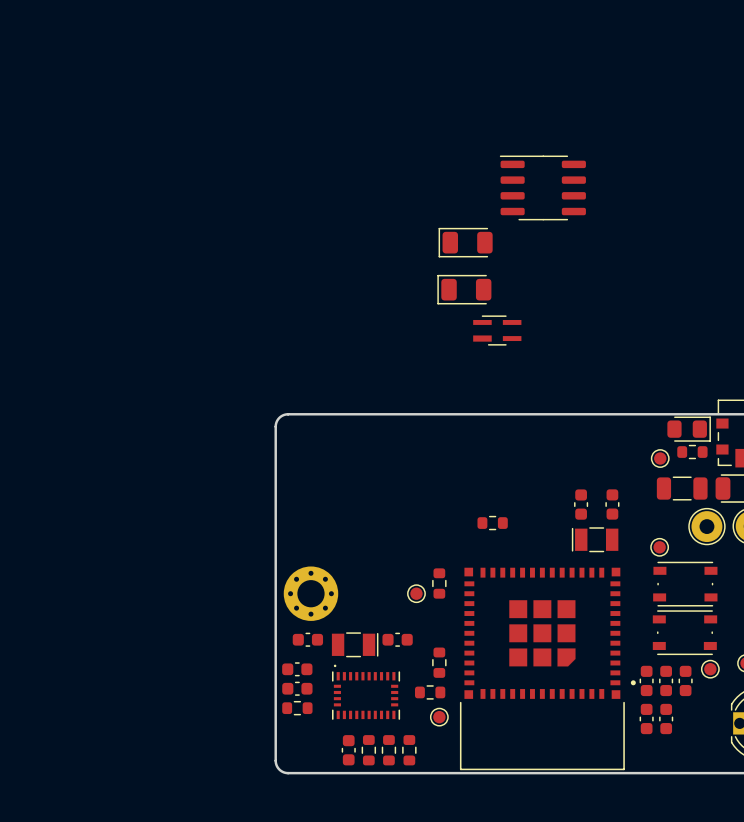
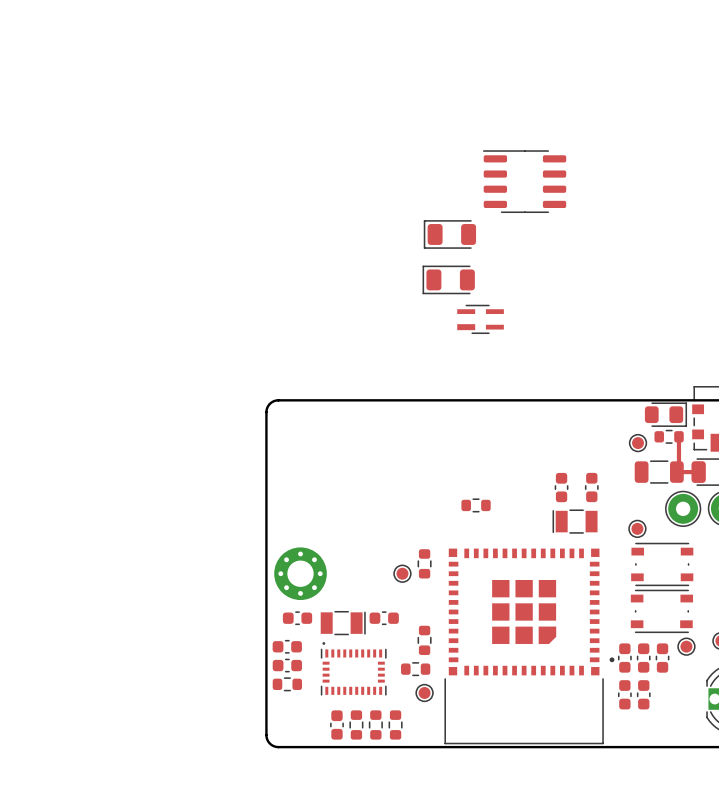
track: none -> (678, 436) (678, 469) (676, 472) (698, 472)

